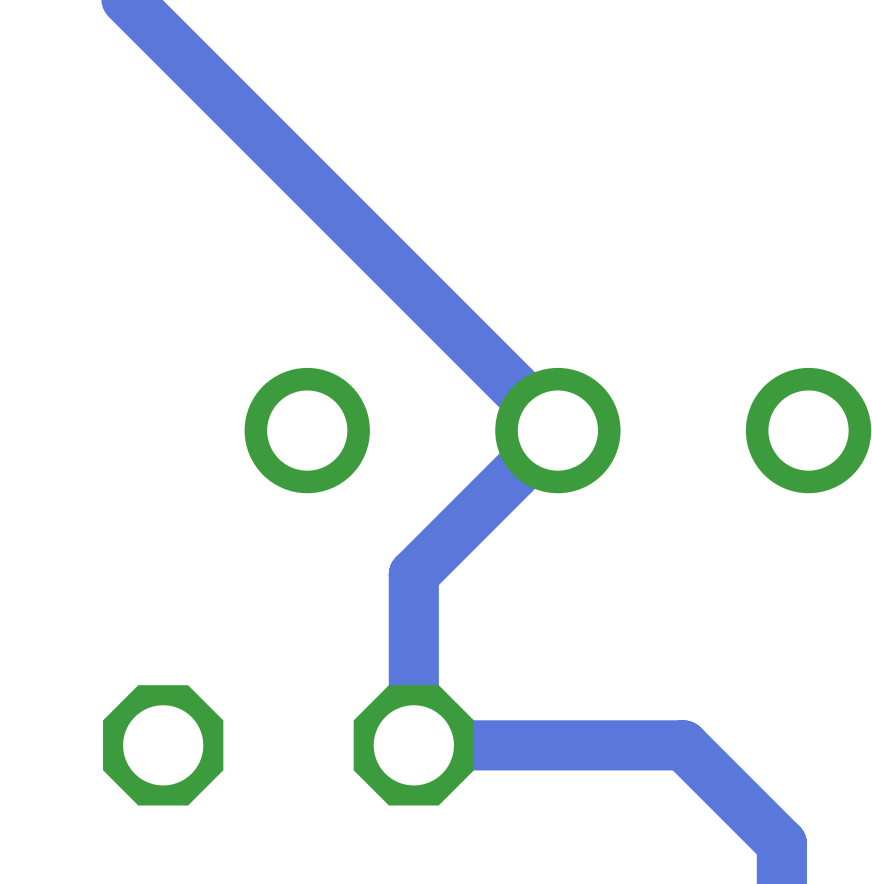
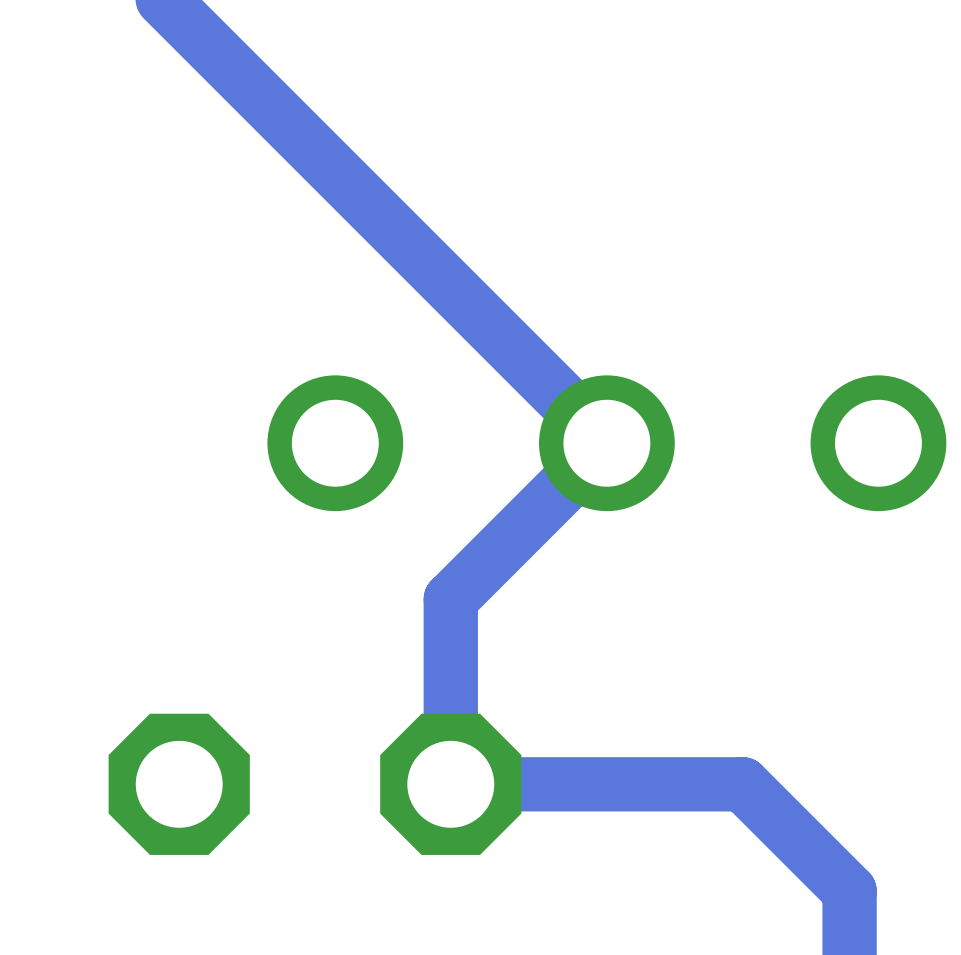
part footprint: [103, 685, 474, 806] -> [108, 713, 522, 855]

